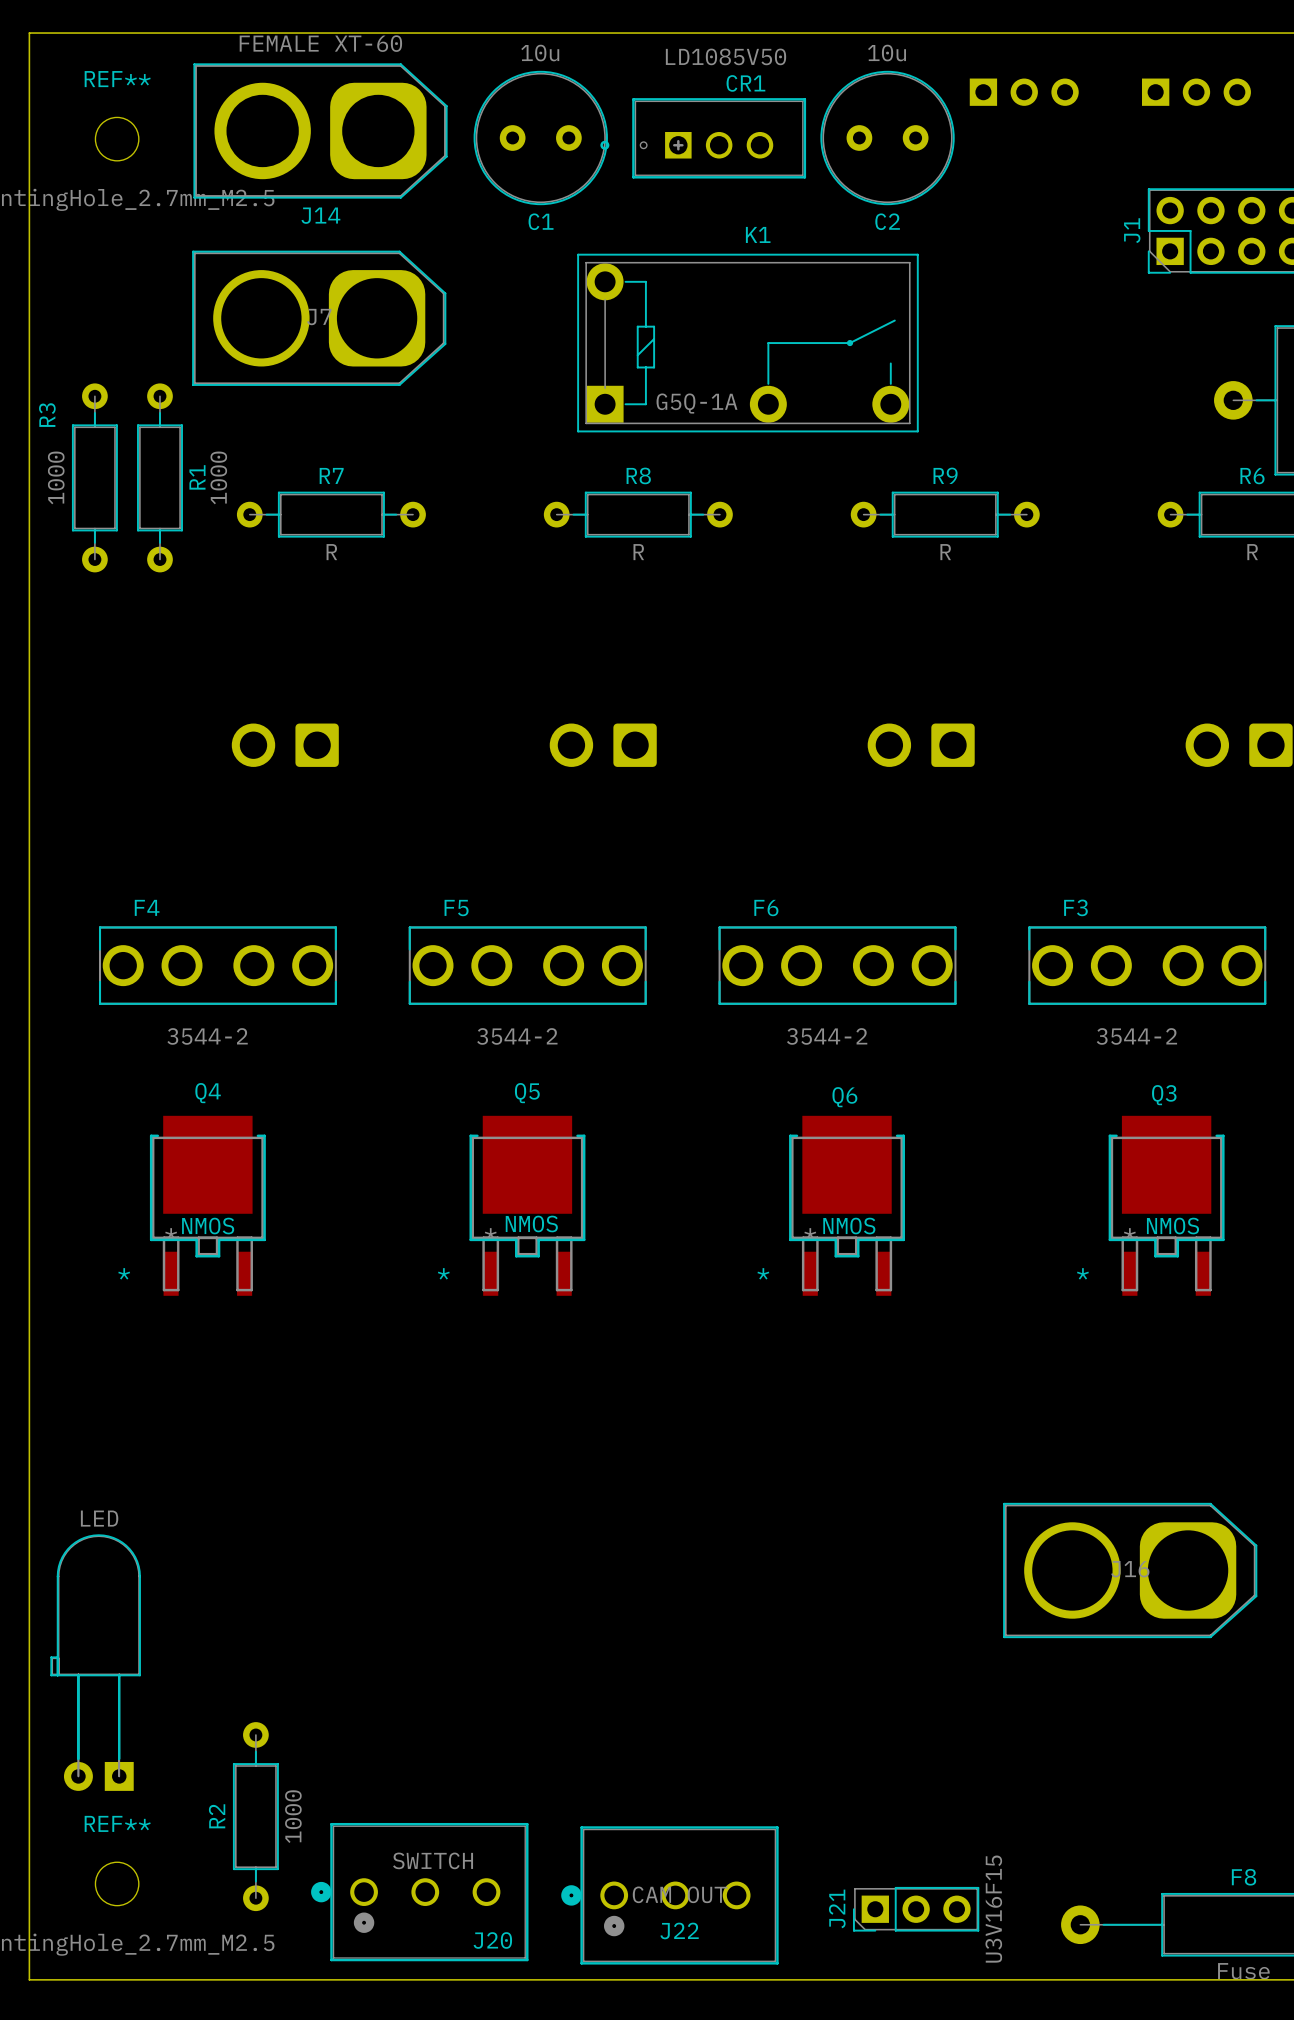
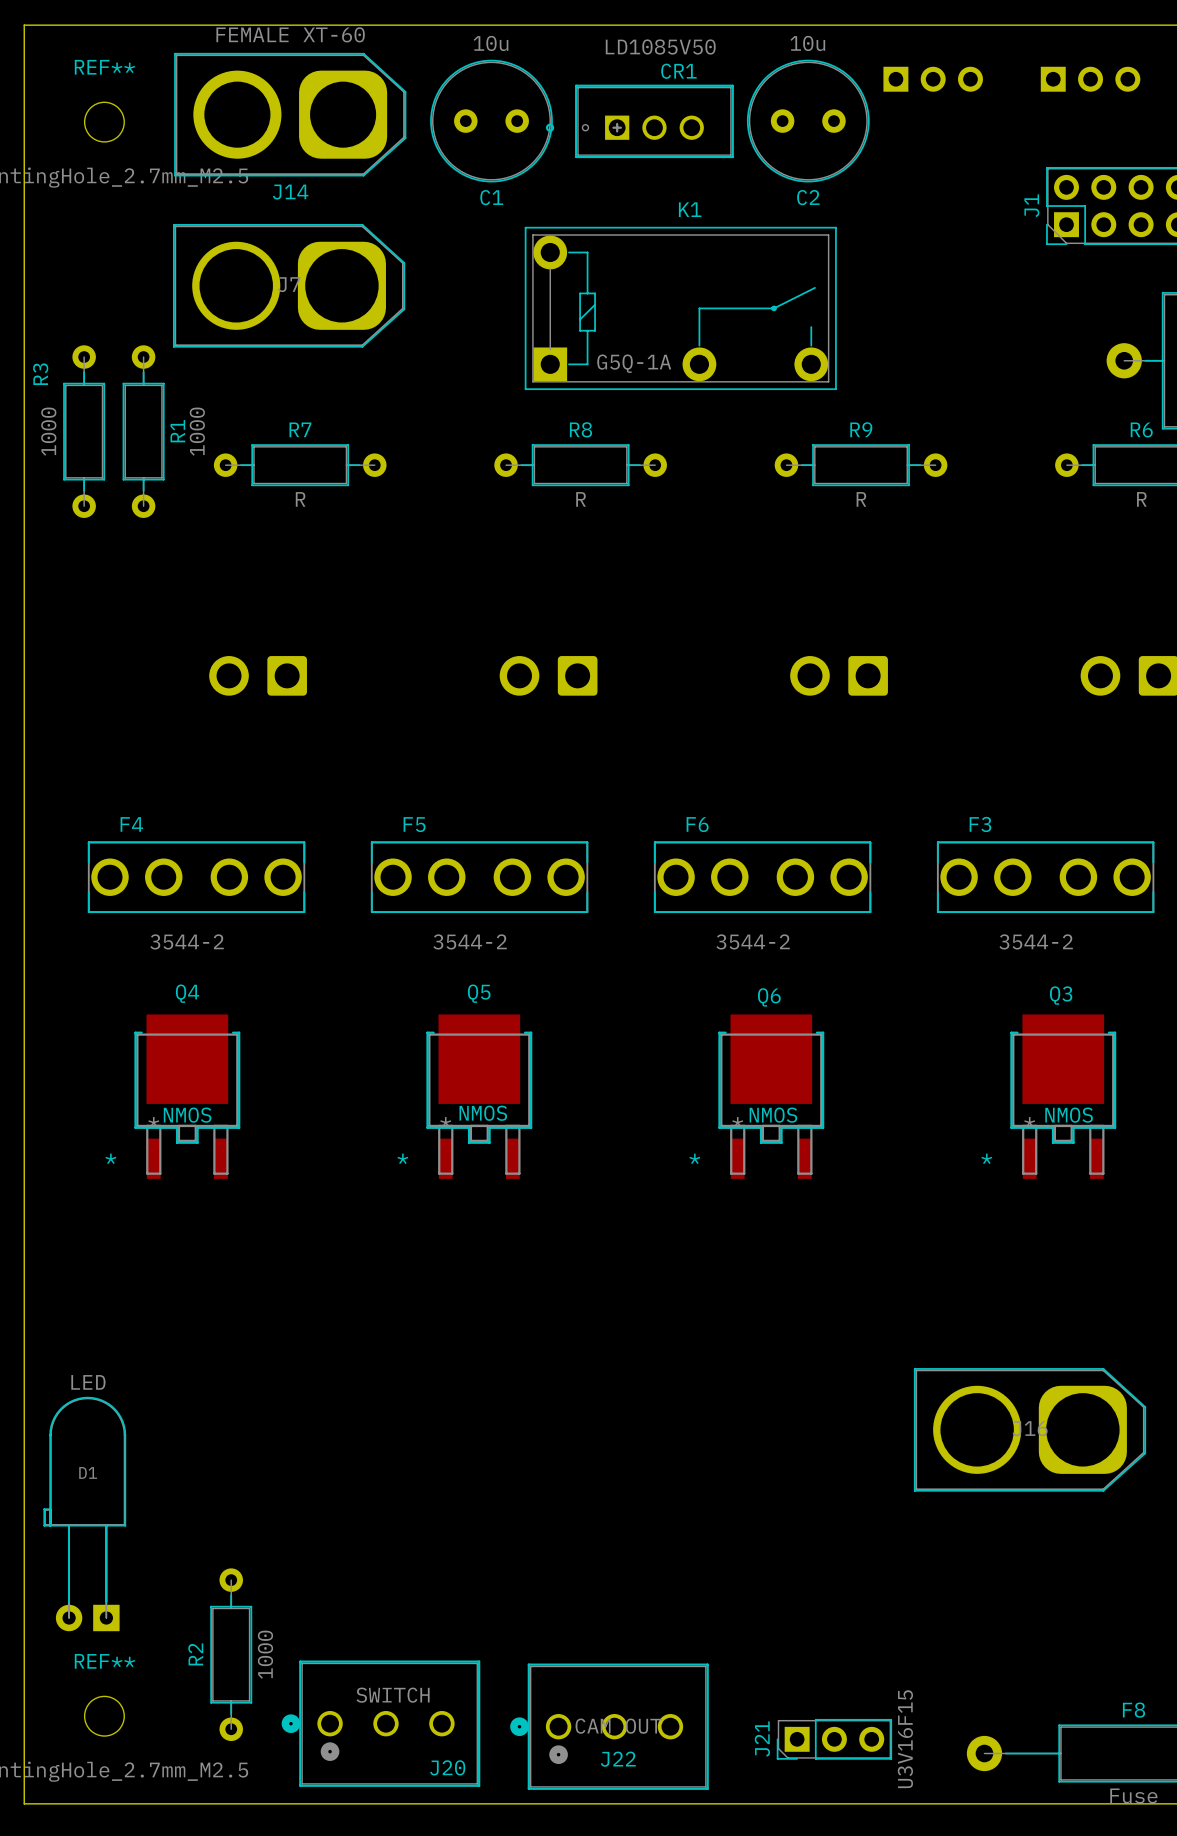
D1 name: none -> D1 (88, 1472)

